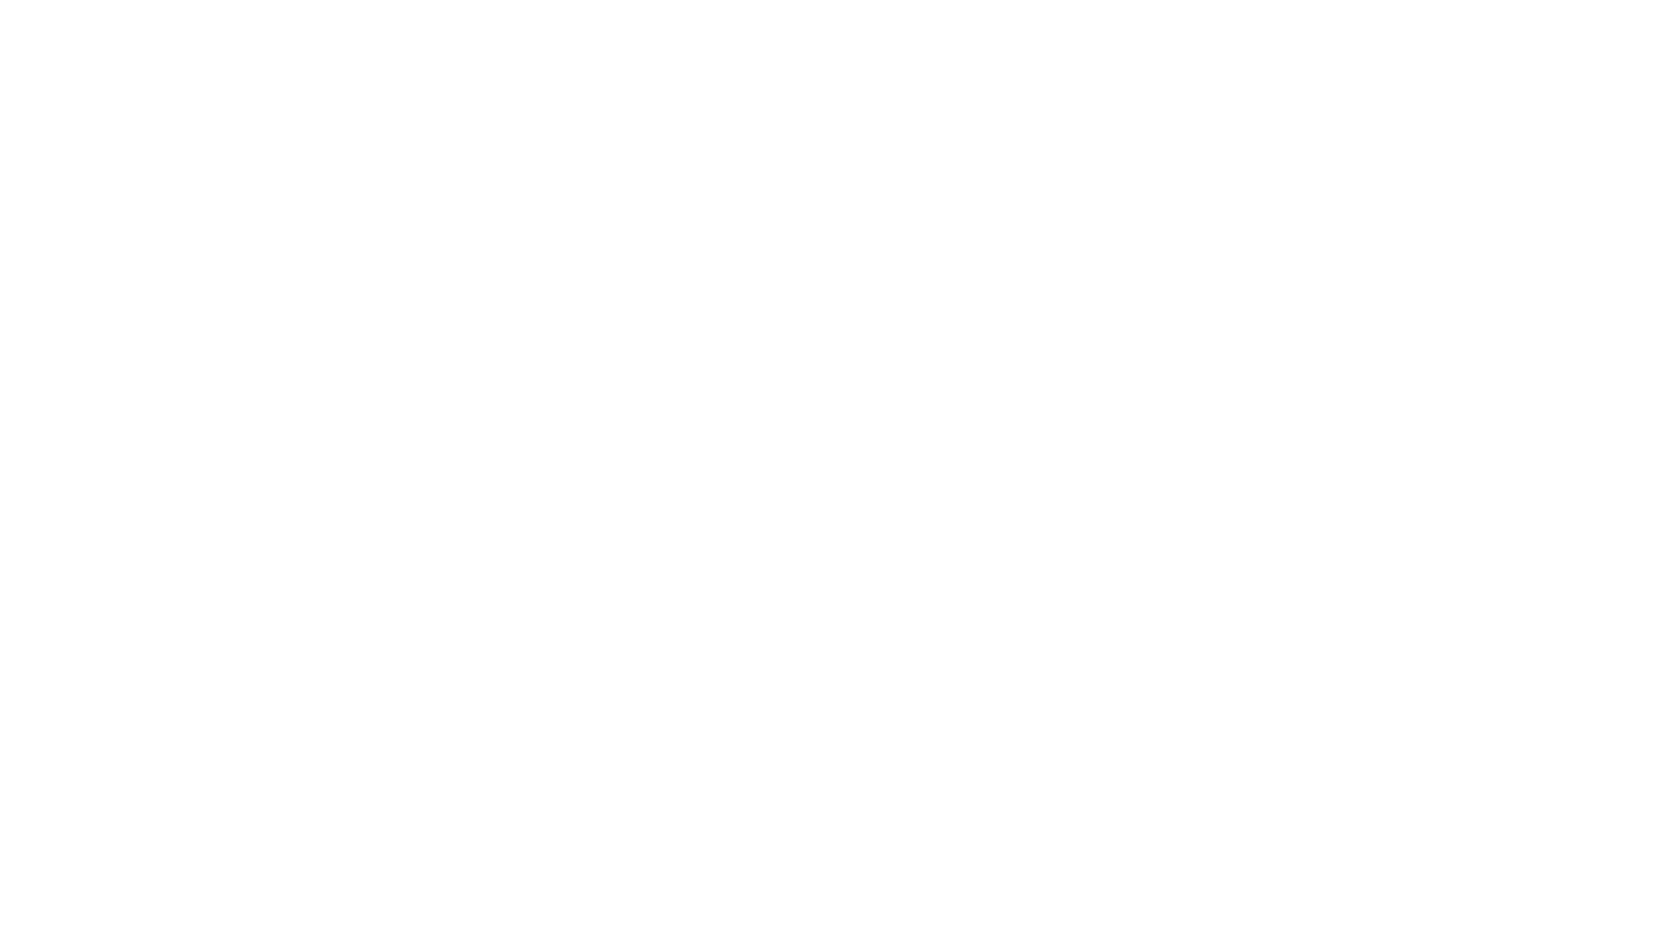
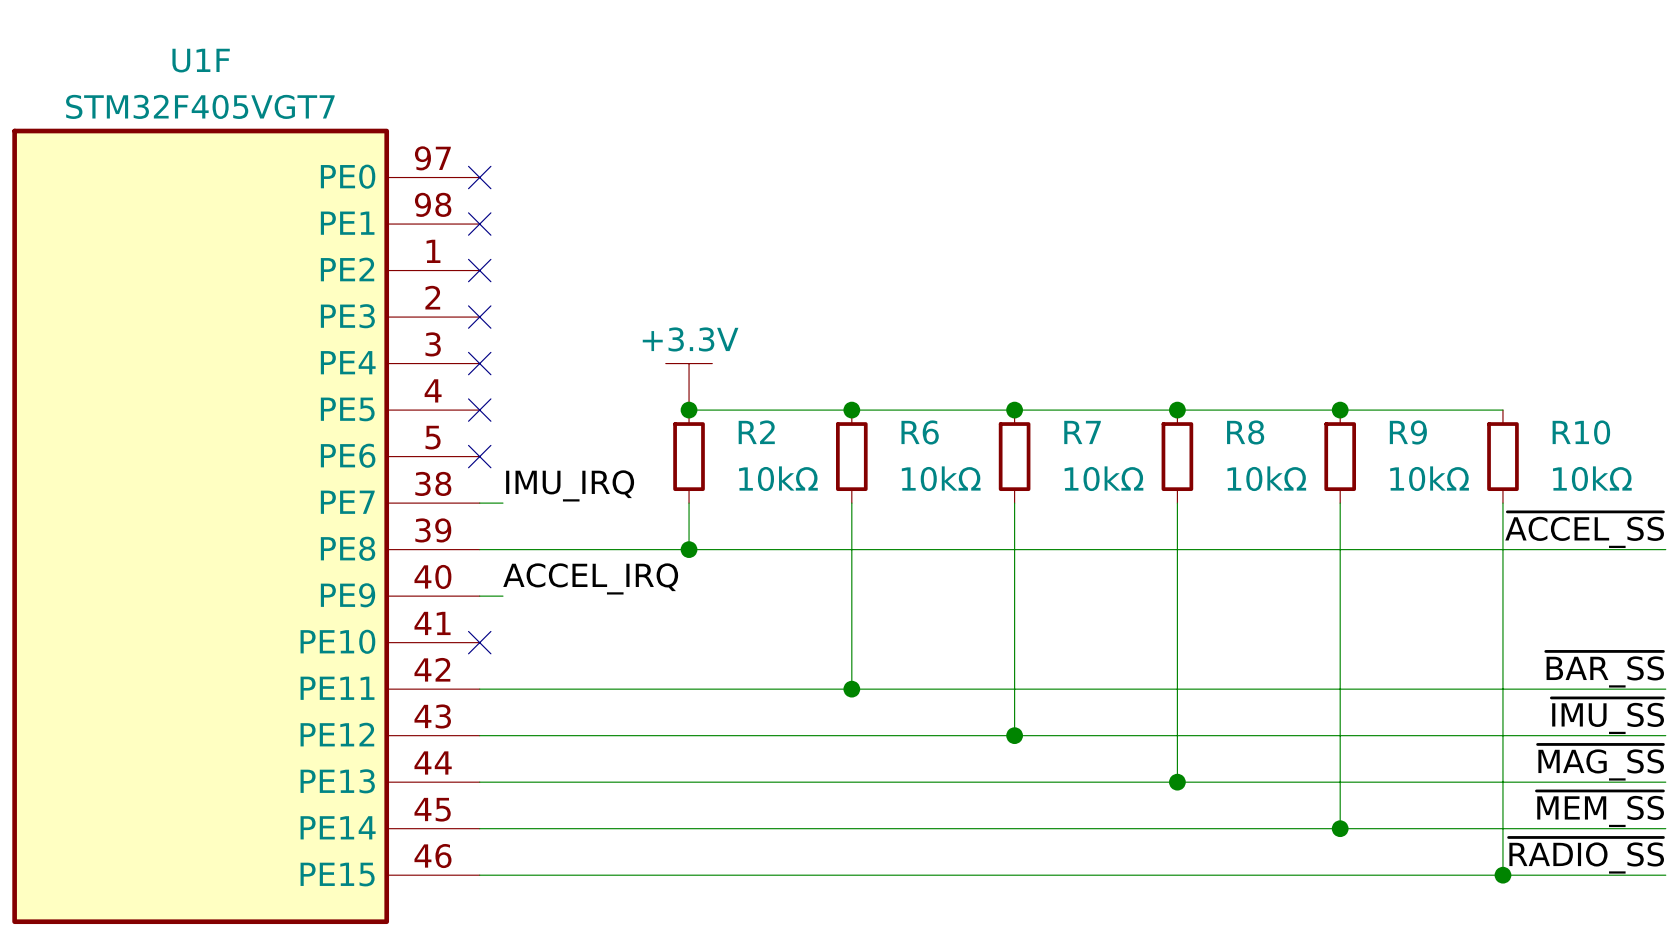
no-connect mark: none -> (479, 177)
no-connect mark: none -> (479, 224)
no-connect mark: none -> (479, 270)
no-connect mark: none -> (479, 317)
no-connect mark: none -> (479, 363)
power symbol: none -> +3.3V (689, 386)
no-connect mark: none -> (479, 410)
wire: none -> (689, 410) (1502, 410)
junction: none -> (689, 410)
junction: none -> (851, 410)
junction: none -> (1014, 410)
junction: none -> (1177, 410)
junction: none -> (1340, 410)
no-connect mark: none -> (479, 456)
R2: none -> 10kΩ (689, 456)
R6: none -> 10kΩ (851, 456)
R7: none -> 10kΩ (1014, 456)
R8: none -> 10kΩ (1177, 456)
R9: none -> 10kΩ (1340, 456)
R10: none -> 10kΩ (1502, 456)
label: none -> IMU_IRQ (570, 485)
wire: none -> (479, 503) (502, 503)
wire: none -> (689, 503) (689, 549)
wire: none -> (851, 503) (851, 689)
wire: none -> (1014, 503) (1014, 735)
wire: none -> (1177, 503) (1177, 782)
wire: none -> (1340, 503) (1340, 828)
wire: none -> (1502, 503) (1502, 875)
U1F: none -> STM32F405VGT7 (246, 526)
label: none -> ~{ACCEL_SS} (1584, 529)
wire: none -> (479, 549) (1665, 549)
junction: none -> (689, 549)
label: none -> ACCEL_IRQ (590, 578)
wire: none -> (479, 596) (502, 596)
no-connect mark: none -> (479, 642)
label: none -> ~{BAR_SS} (1604, 669)
wire: none -> (479, 689) (1665, 689)
junction: none -> (851, 689)
label: none -> ~{IMU_SS} (1607, 715)
wire: none -> (479, 735) (1665, 735)
junction: none -> (1014, 735)
label: none -> ~{MAG_SS} (1600, 762)
wire: none -> (479, 782) (1665, 782)
junction: none -> (1177, 782)
label: none -> ~{MEM_SS} (1600, 809)
wire: none -> (479, 828) (1665, 828)
junction: none -> (1340, 828)
label: none -> ~{RADIO_SS} (1586, 855)
wire: none -> (479, 875) (1665, 875)
junction: none -> (1502, 875)

